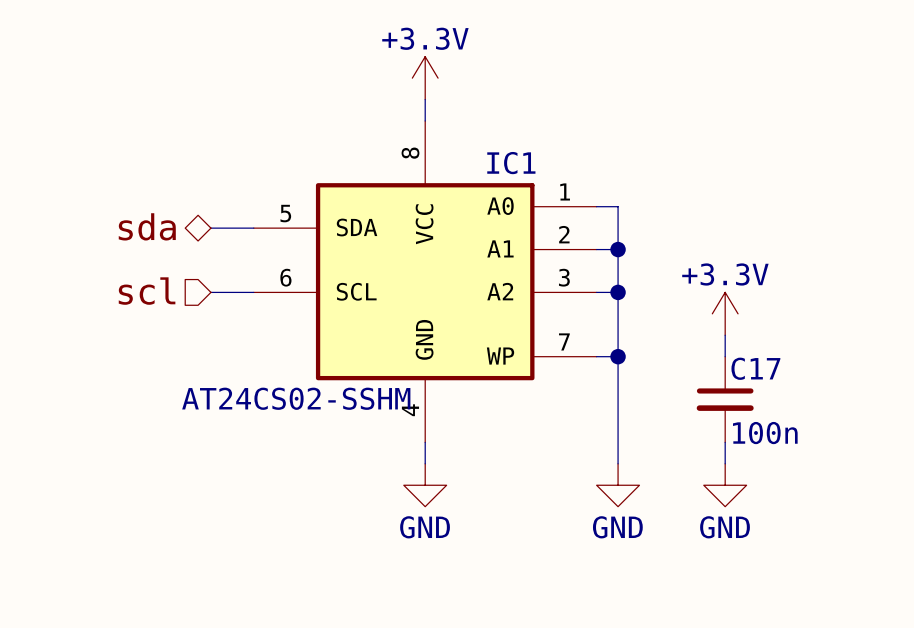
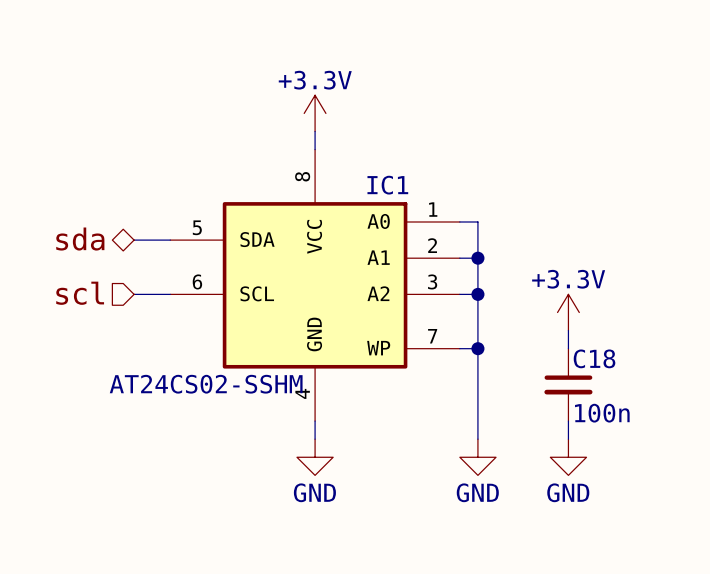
C17 name: C17 (755, 368) -> C18 (594, 358)

